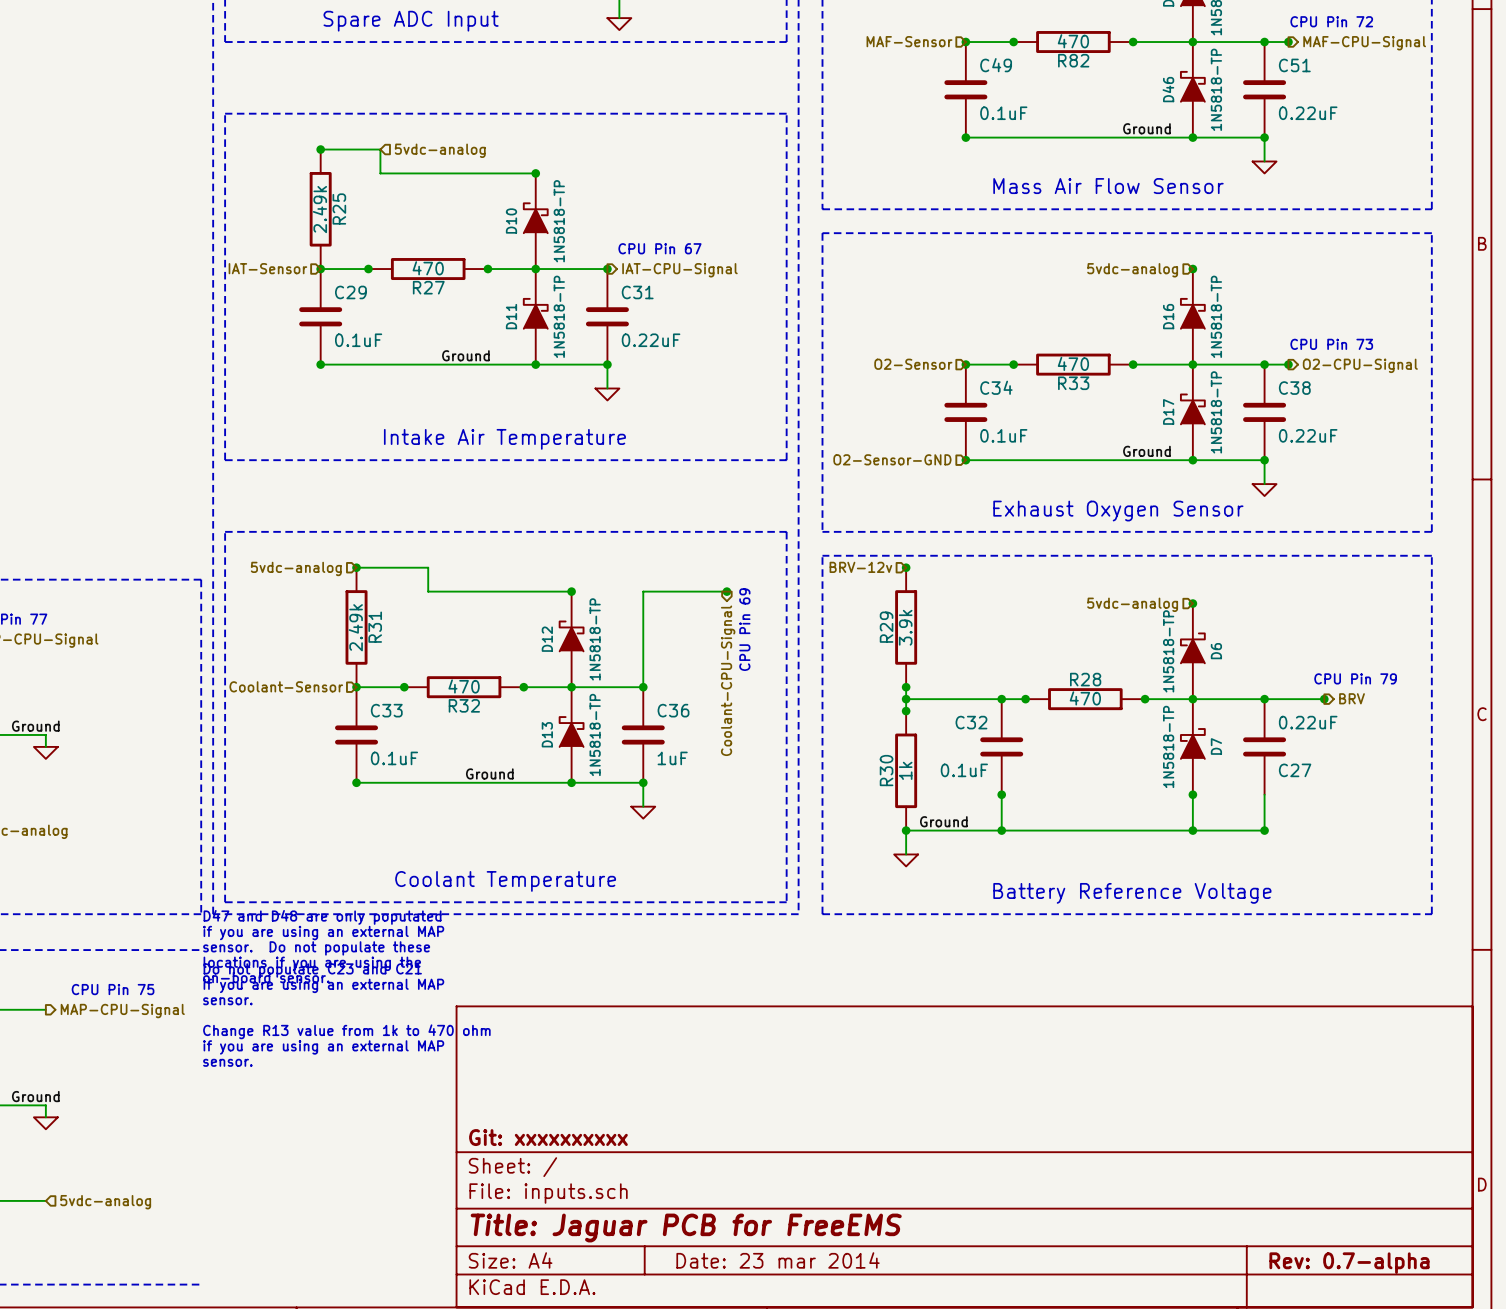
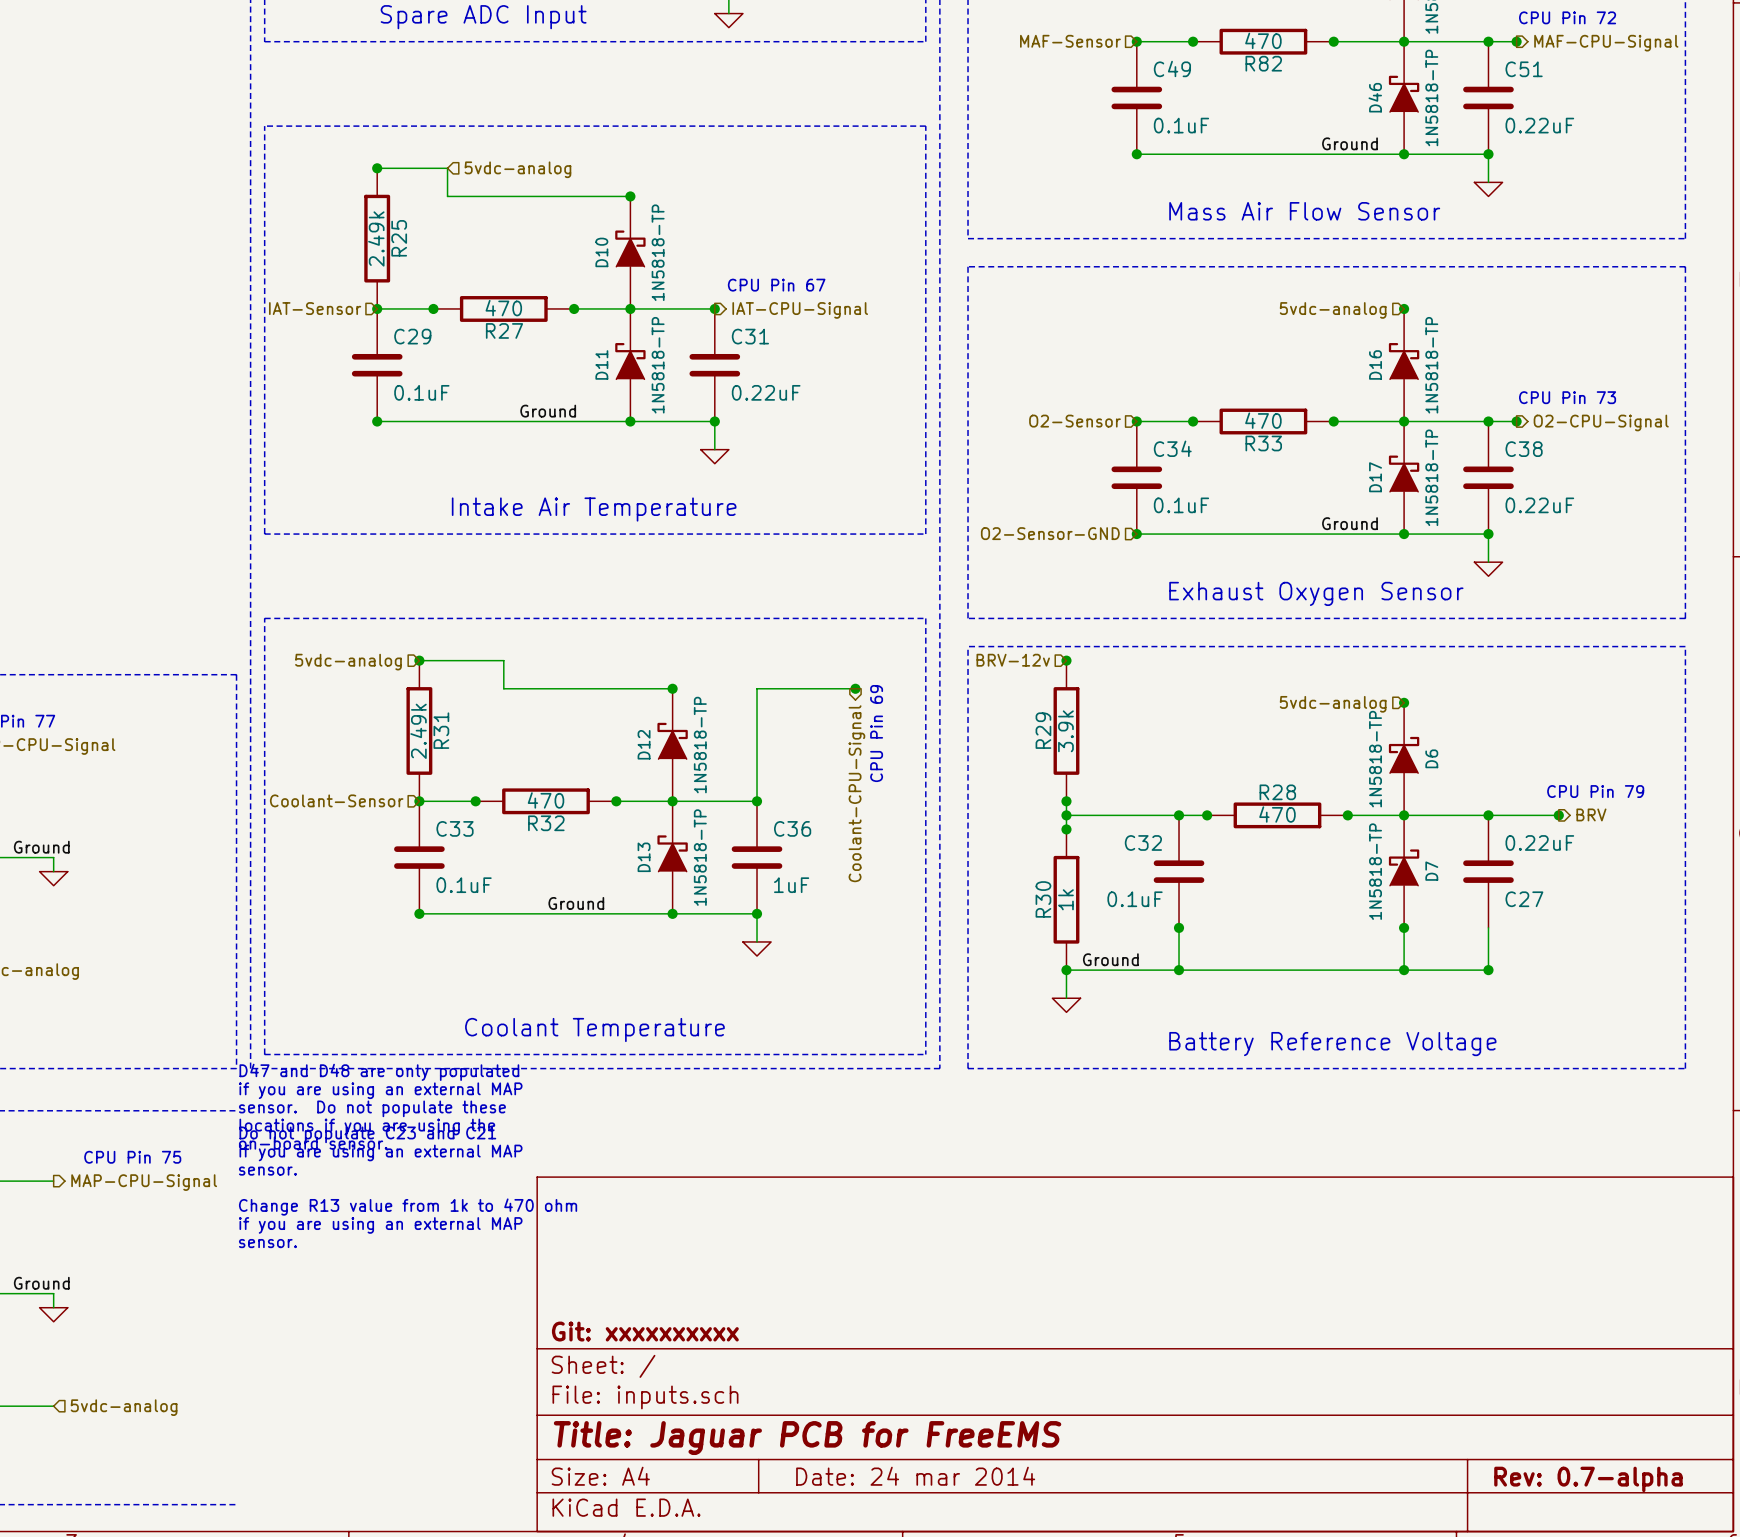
title block: Date: 23 mar 2014 (778, 1260) -> Date: 24 mar 2014 (915, 1476)

